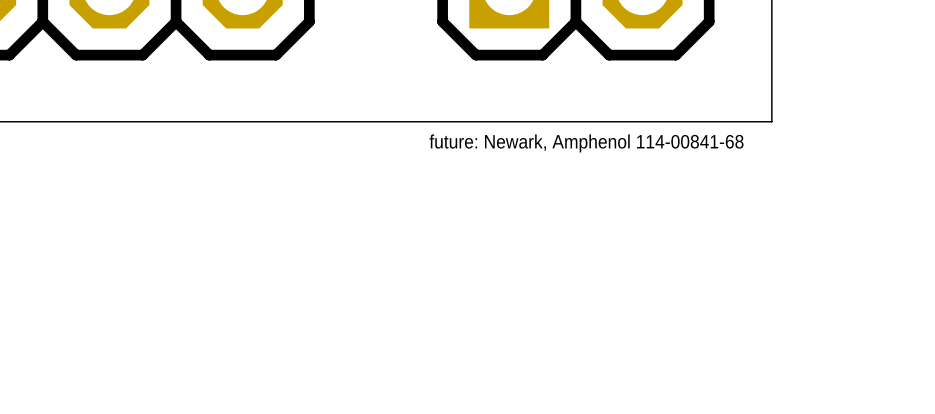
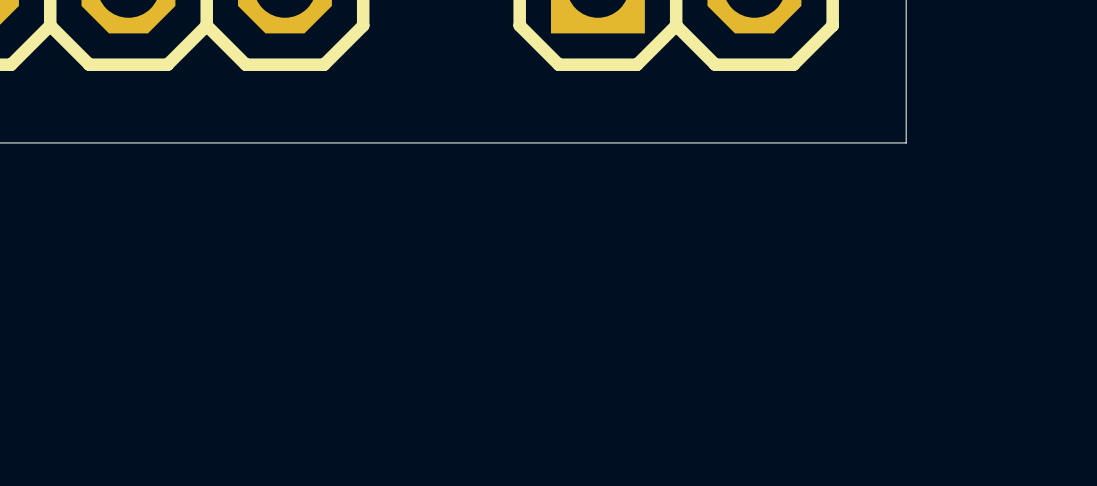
text: future: Newark, Amphenol 114-00841-68 (586, 143) -> none

